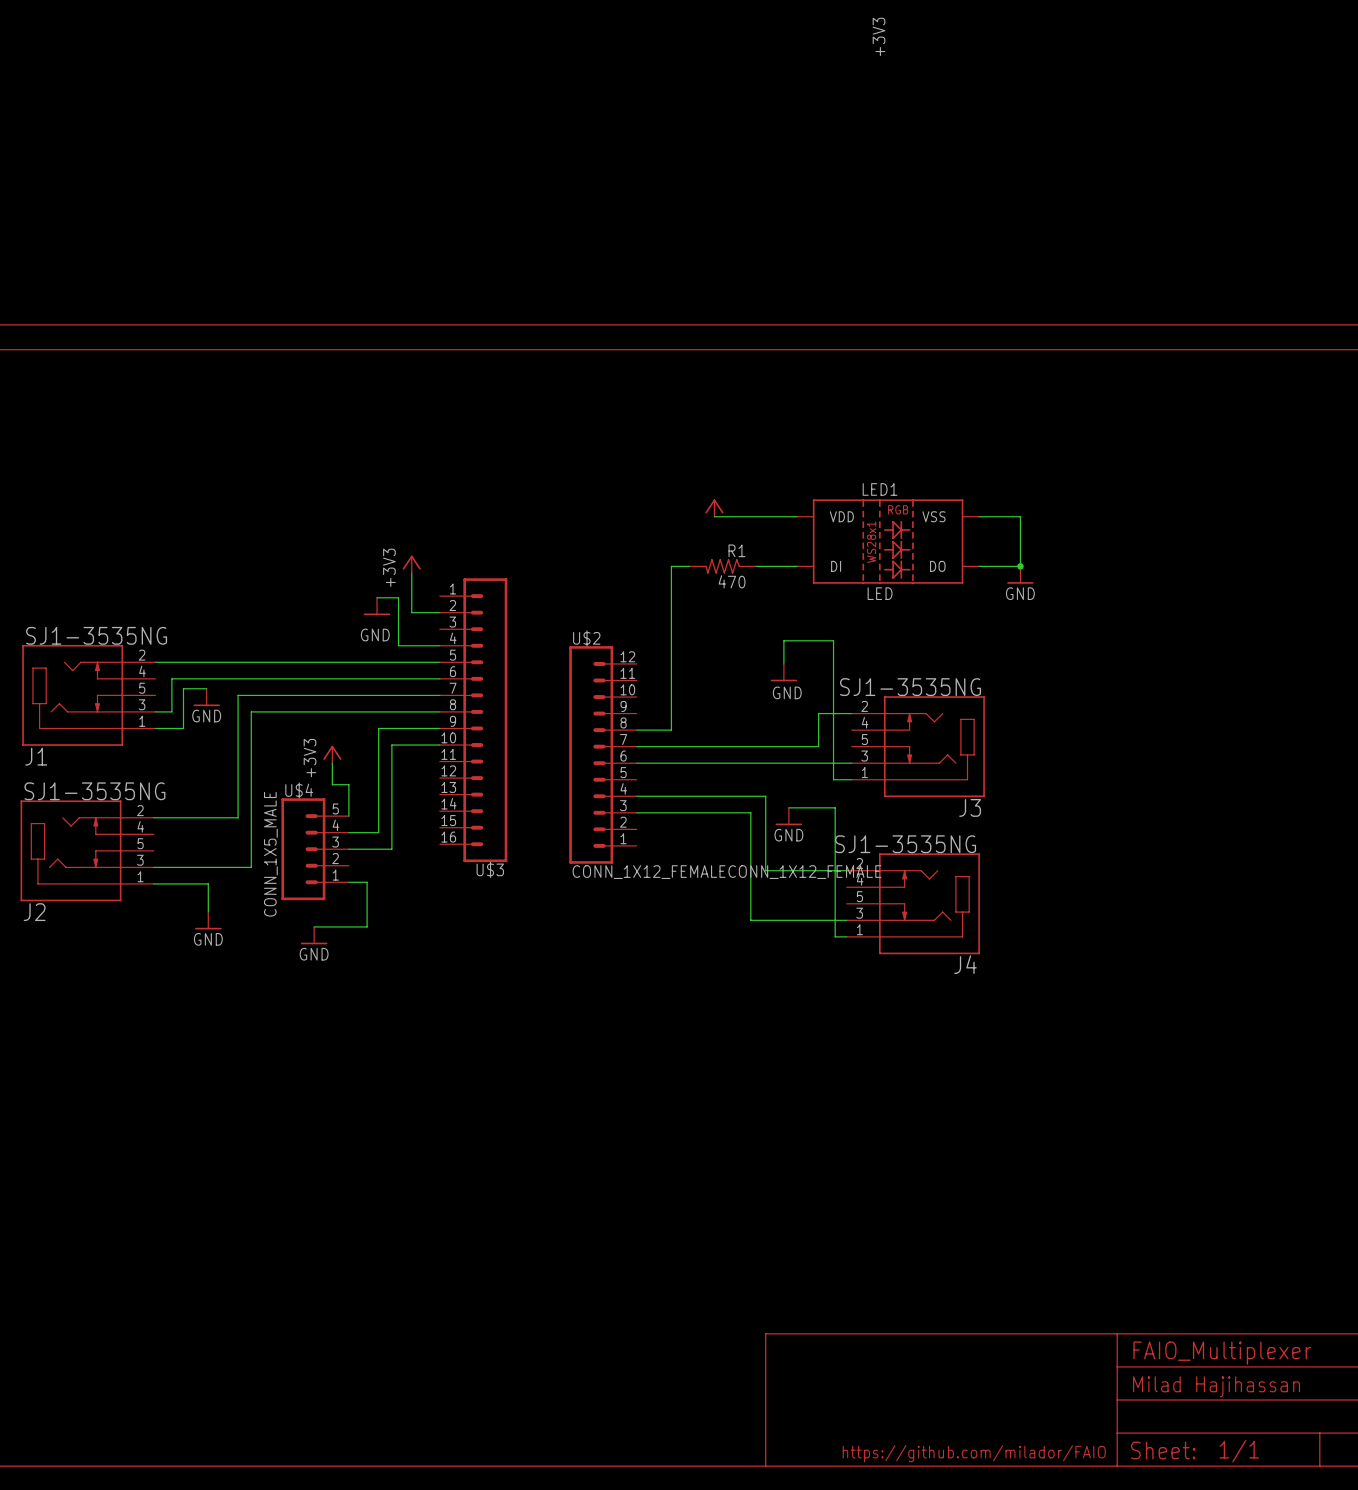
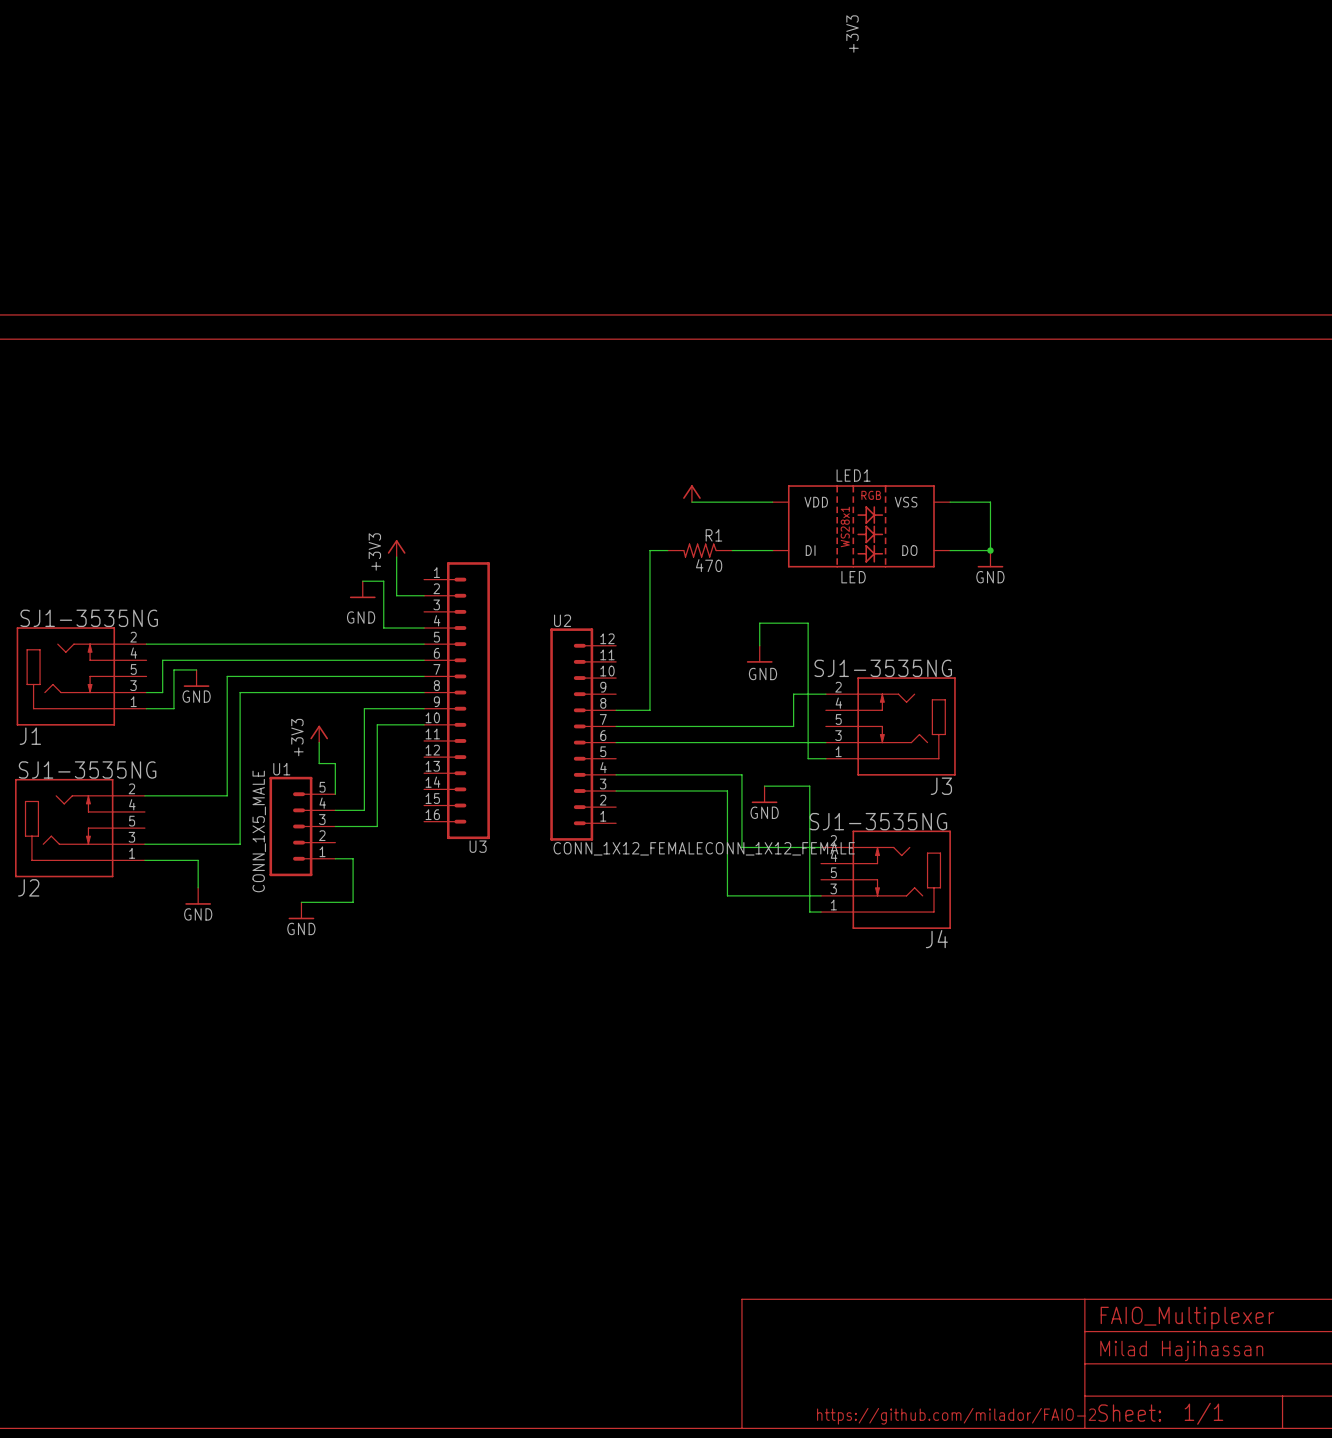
U$2 name: U$2 (586, 638) -> U2 (562, 620)
U$4 name: U$4 (299, 790) -> U1 (281, 769)
U$3 name: U$3 (490, 869) -> U3 (478, 846)
text: https://github.com/milador/FAIO (974, 1453) -> https://github.com/milador/FAIO-2 (956, 1416)

